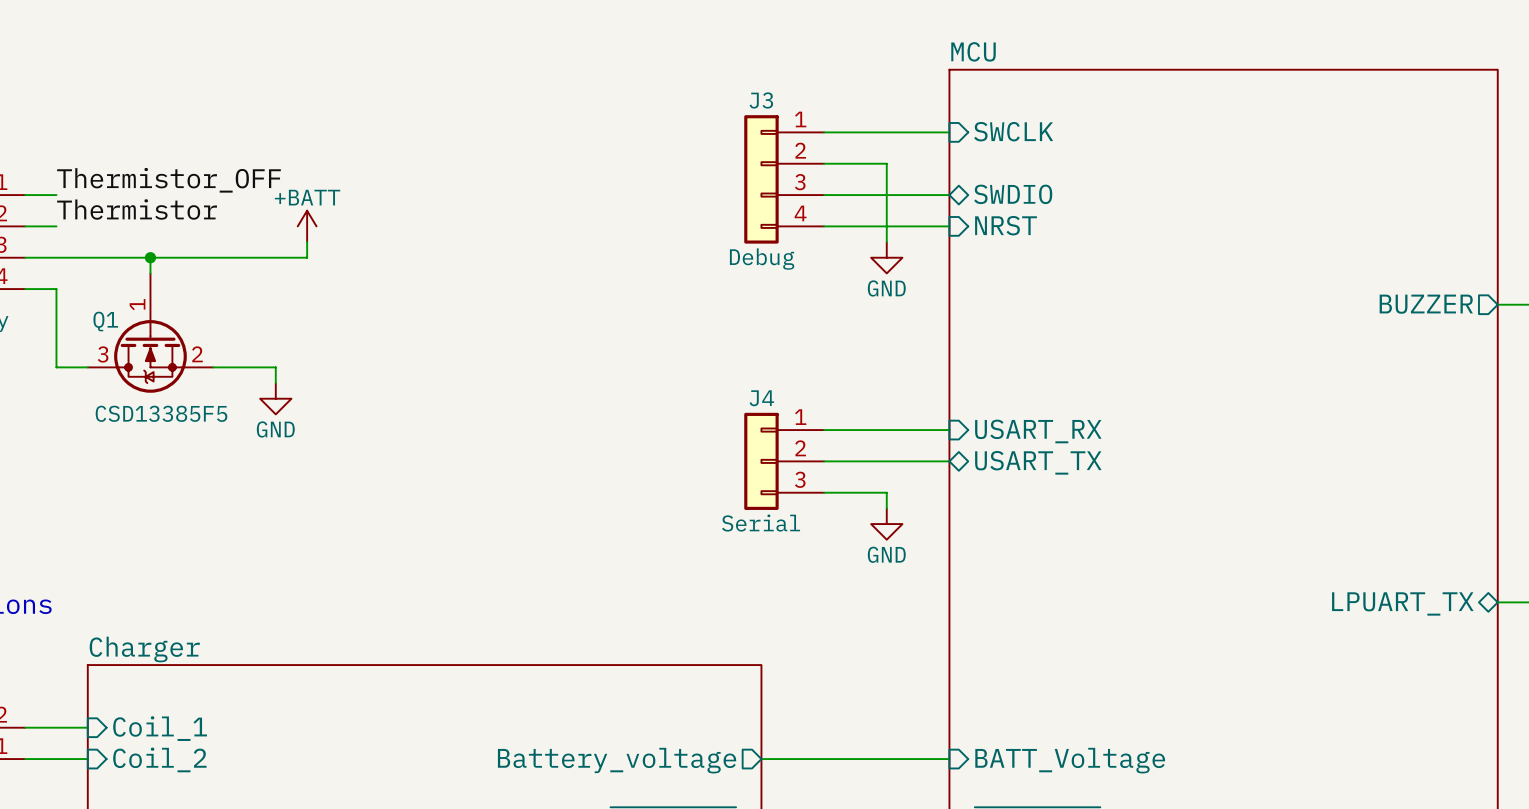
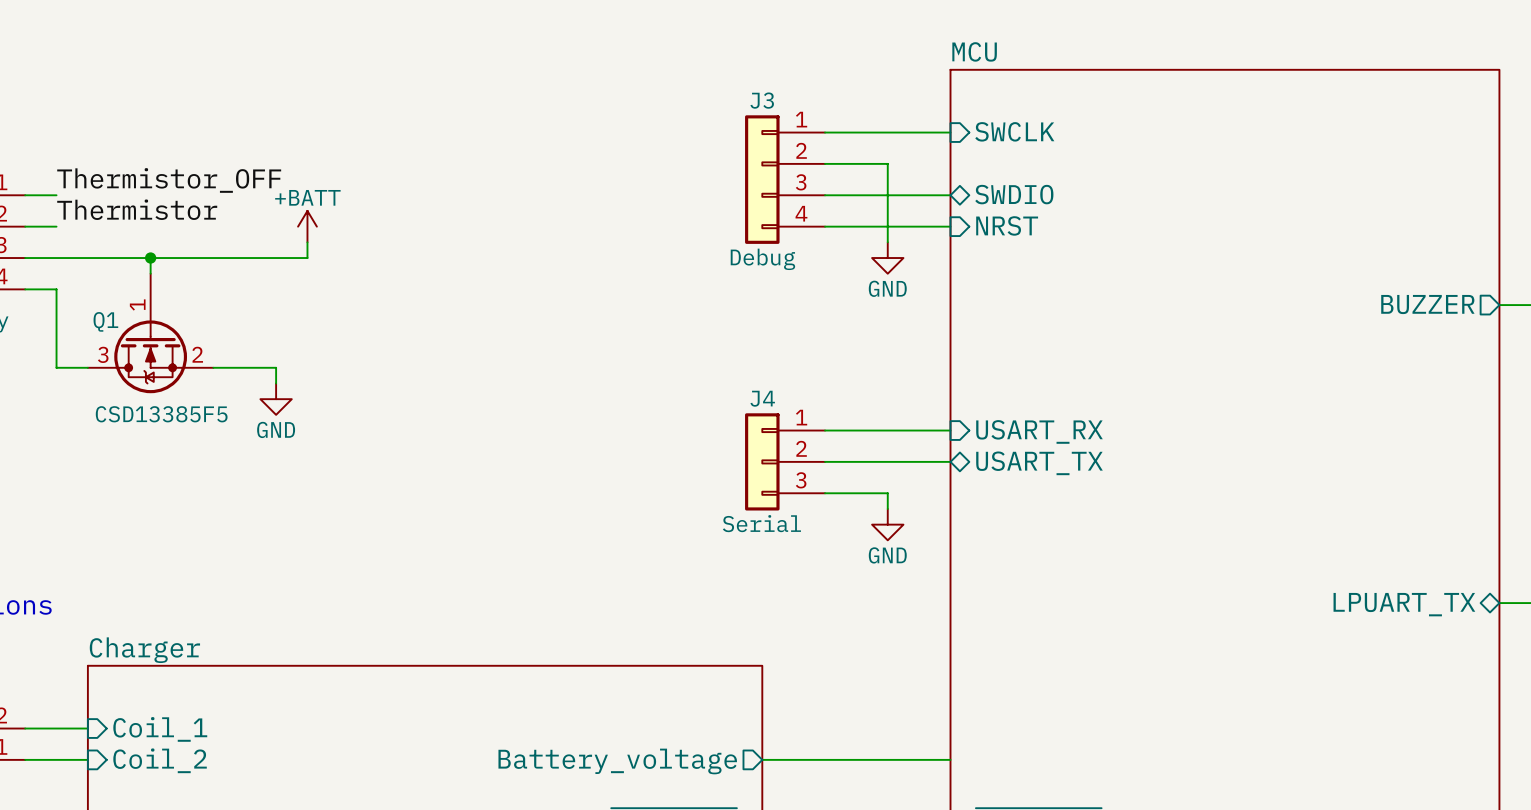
sheet pin: BATT_Voltage (1070, 760) -> none

